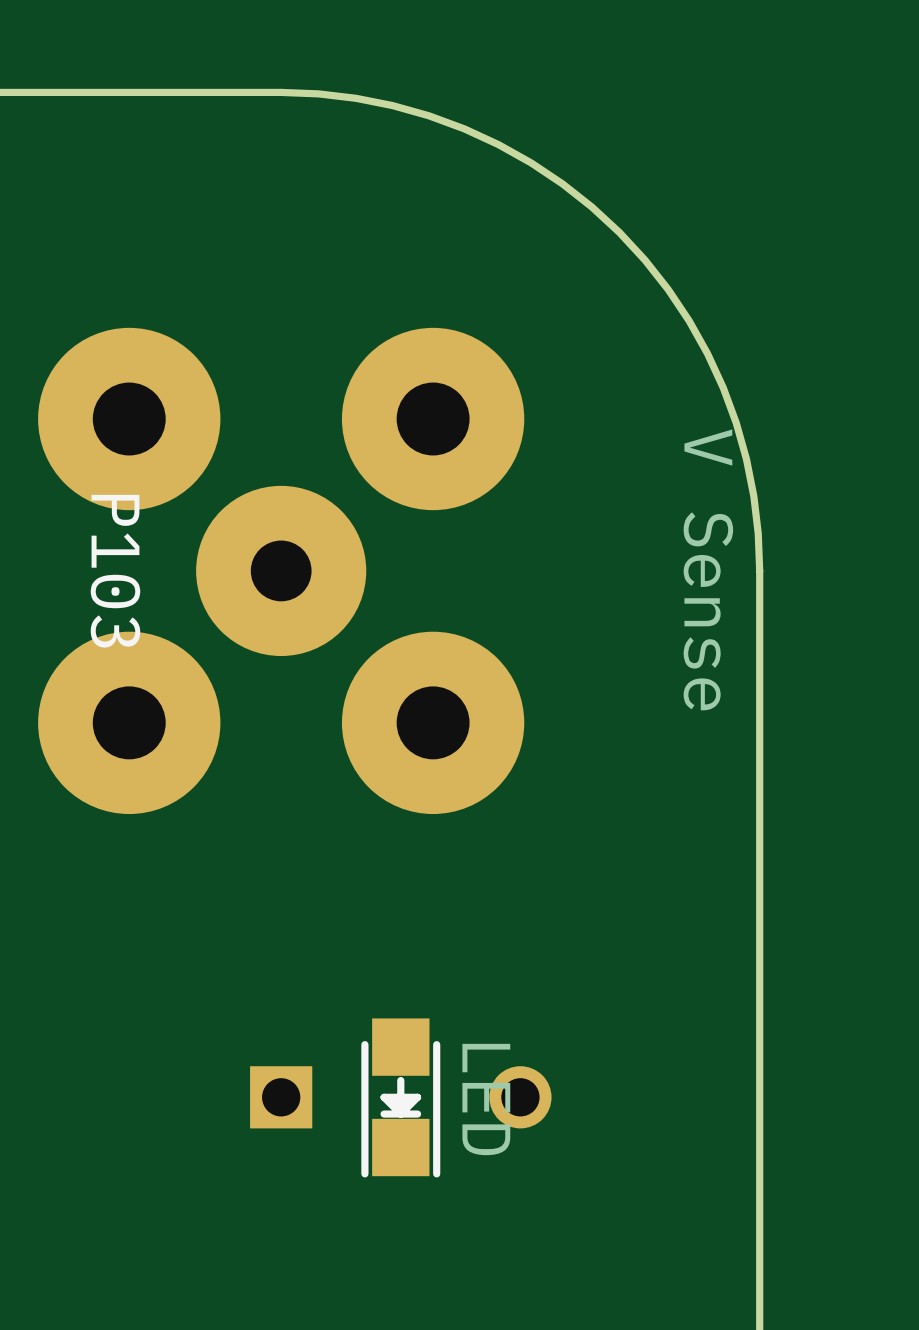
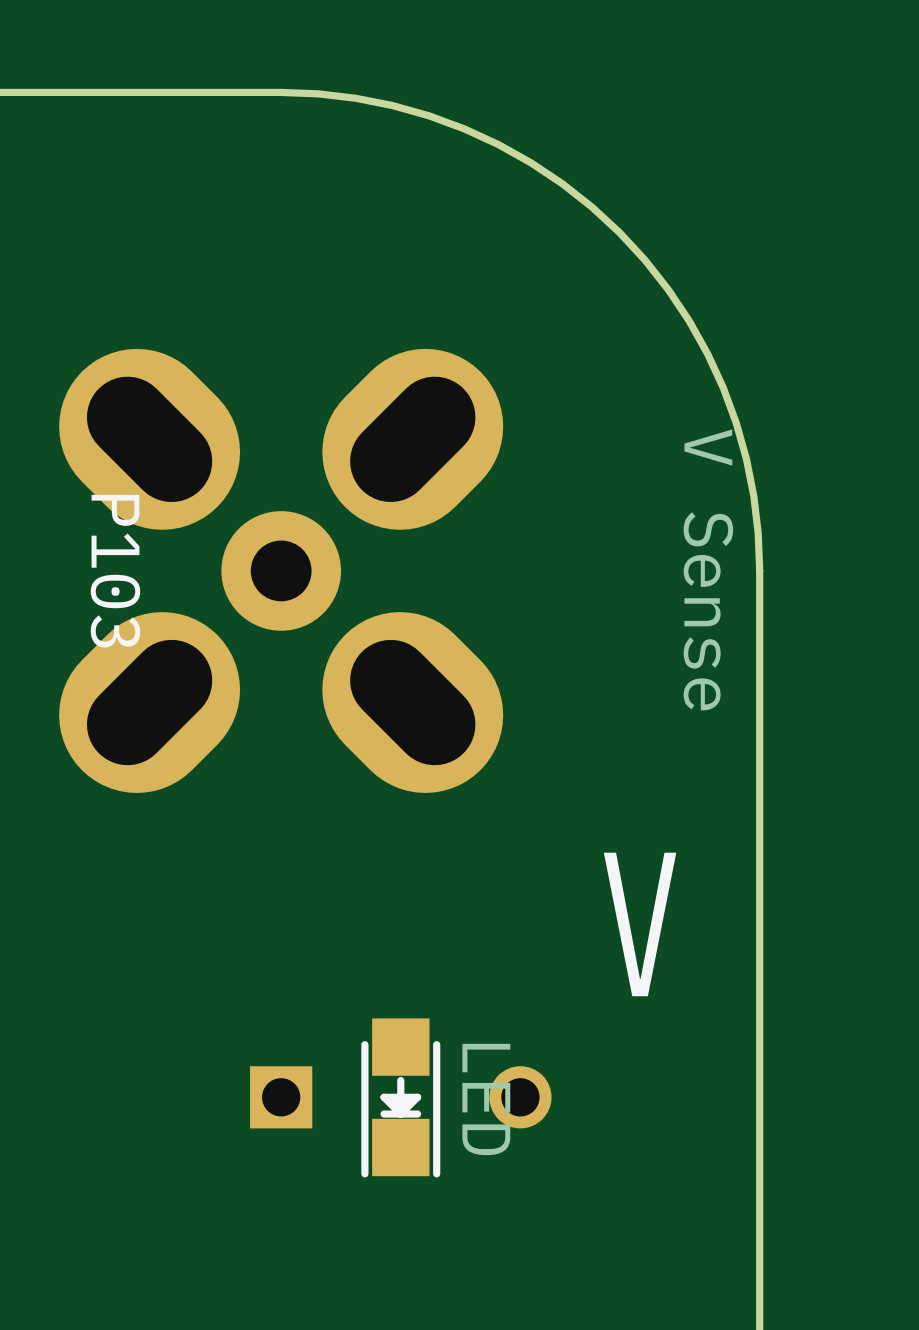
P103 footprint: [38, 327, 525, 815] -> [59, 348, 504, 793]
text: none -> V (640, 924)

